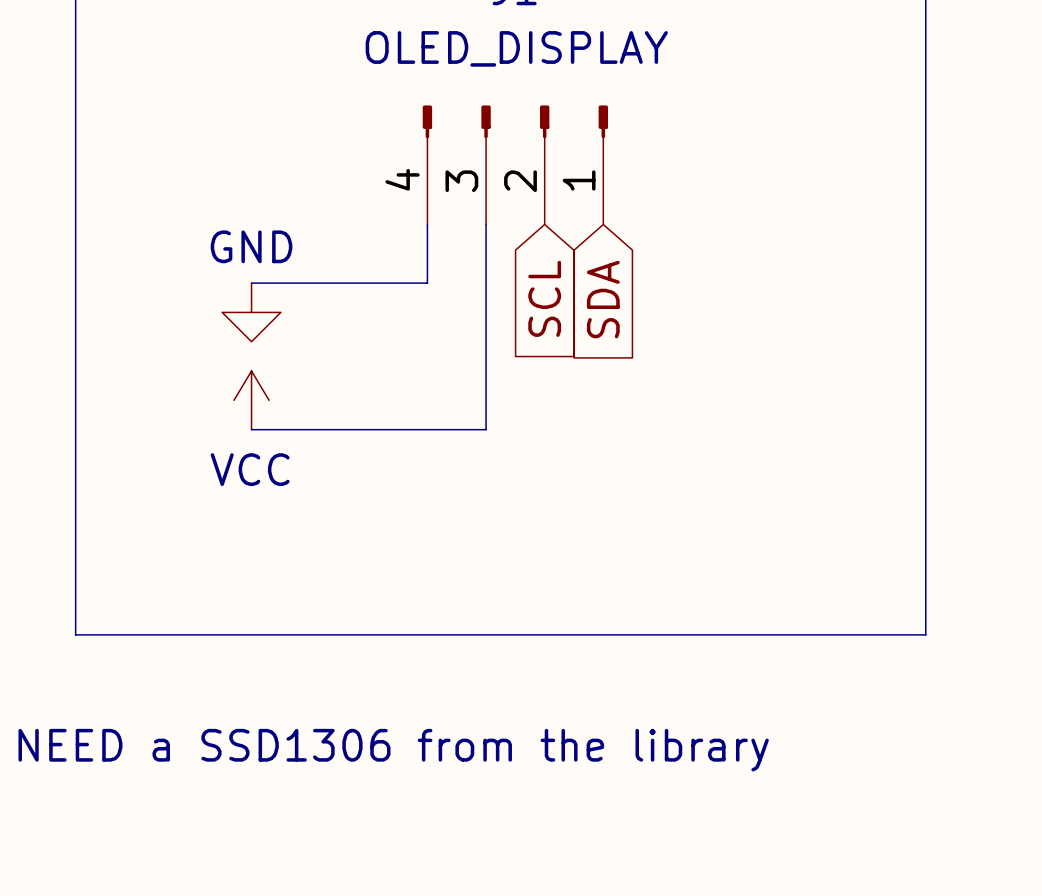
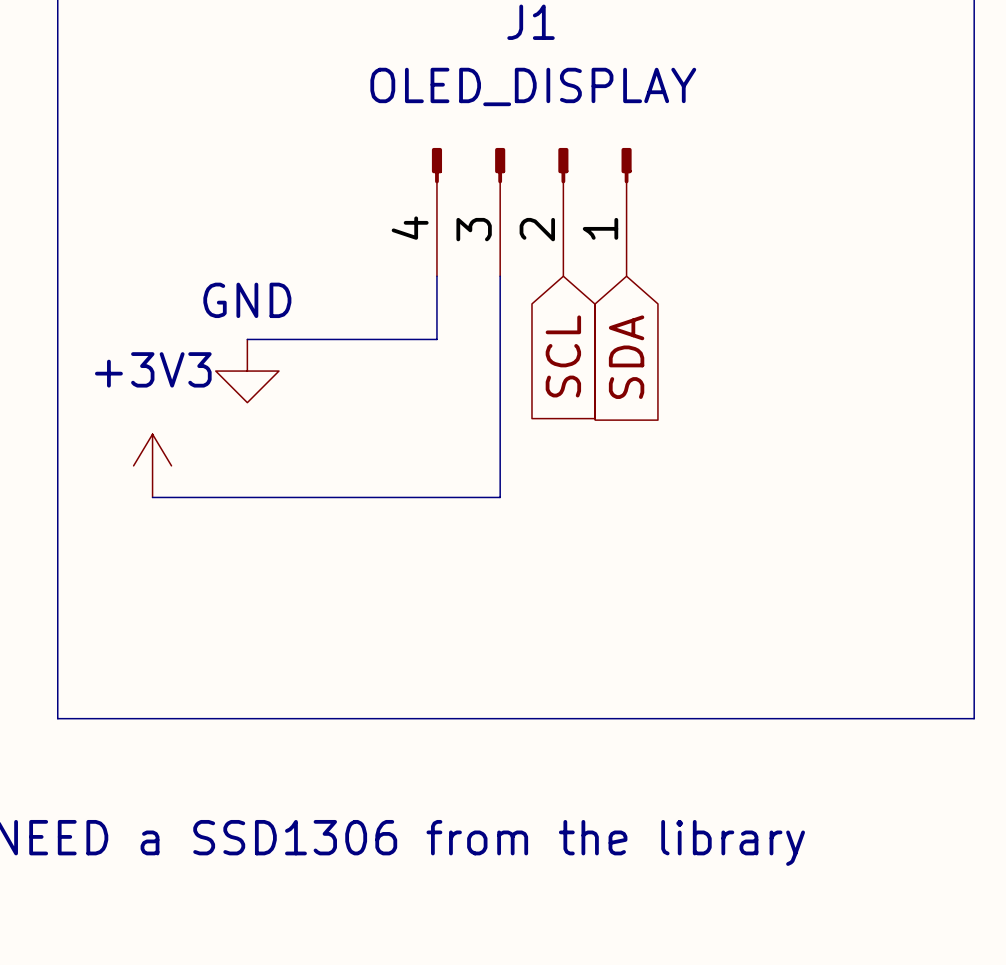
power symbol: none -> +3V3 (152, 465)
power symbol: VCC (251, 400) -> none
wire: none -> (152, 497) (247, 497)

